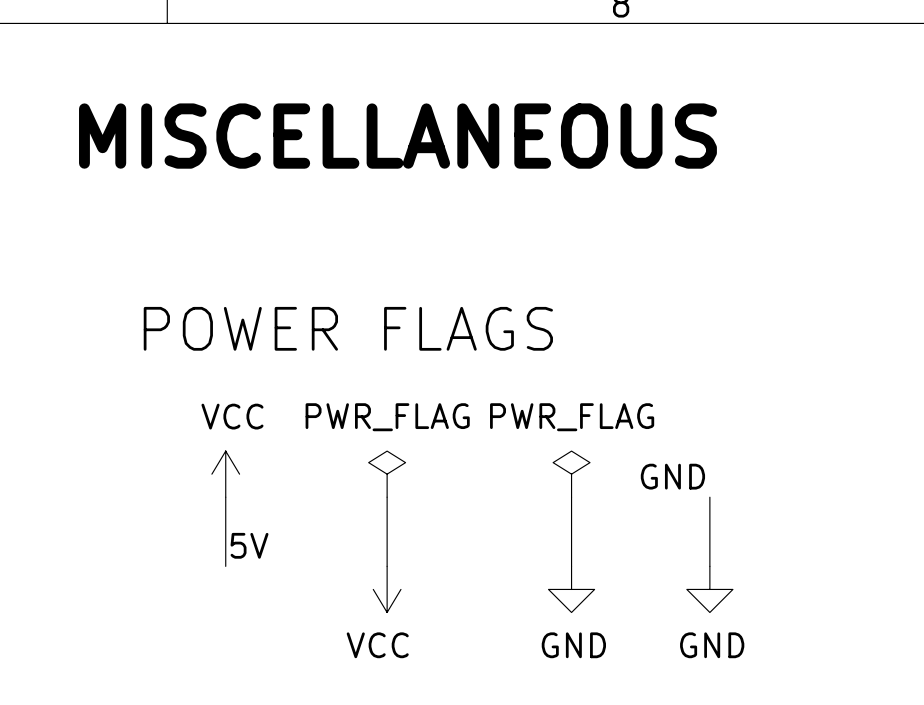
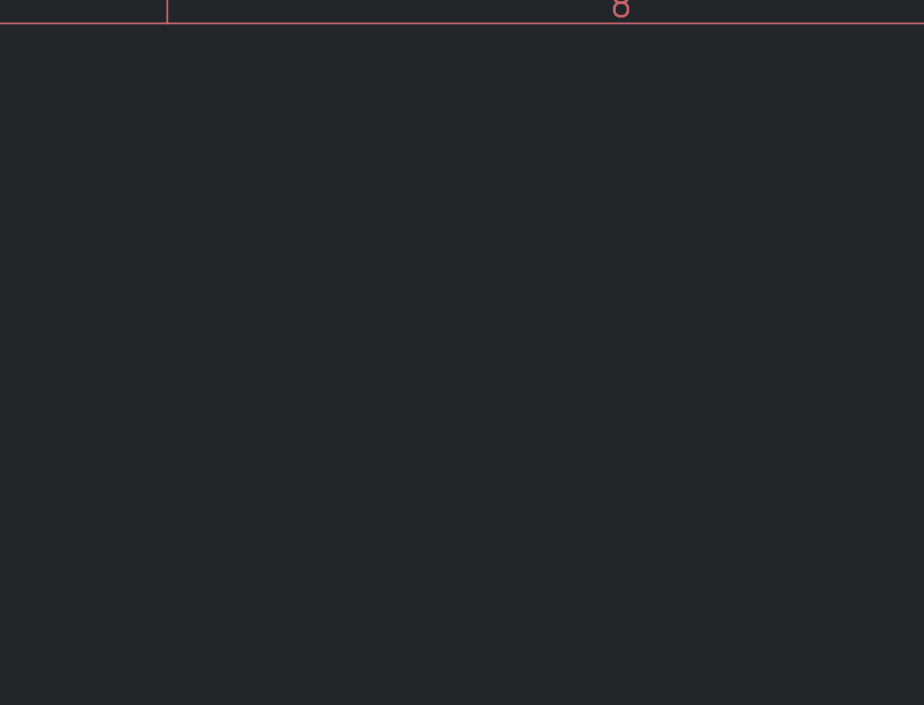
text: MISCELLANEOUS (397, 136) -> none
text: POWER FLAGS (348, 328) -> none
power symbol: VCC (225, 474) -> none
power symbol: PWR_FLAG (387, 474) -> none
power symbol: PWR_FLAG (571, 474) -> none
label: GND (672, 476) -> none
wire: (225, 497) (225, 566) -> none
wire: (387, 497) (387, 566) -> none
wire: (571, 497) (571, 566) -> none
wire: (709, 497) (709, 566) -> none
label: 5V (249, 545) -> none
power symbol: VCC (387, 589) -> none
power symbol: GND (571, 589) -> none
power symbol: GND (709, 589) -> none

